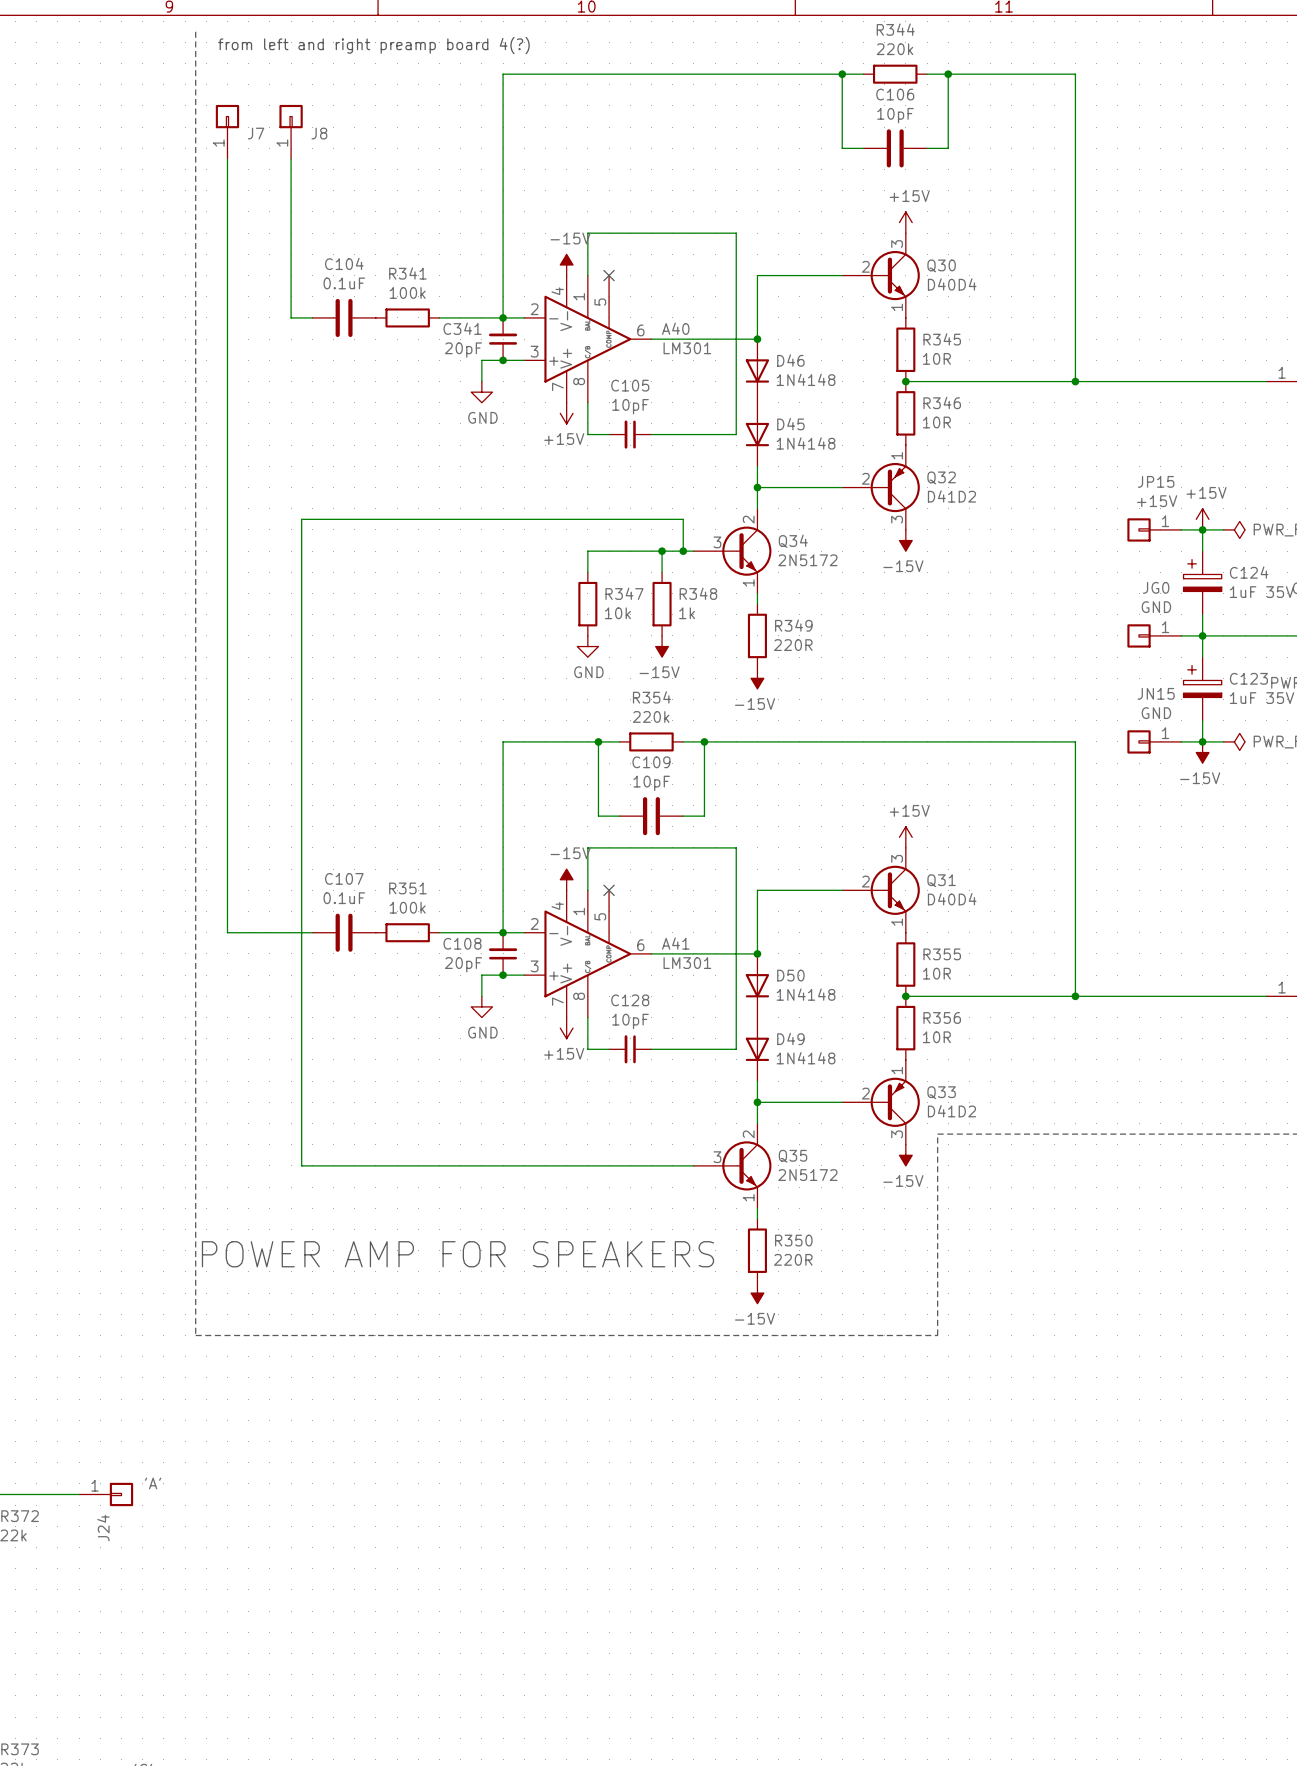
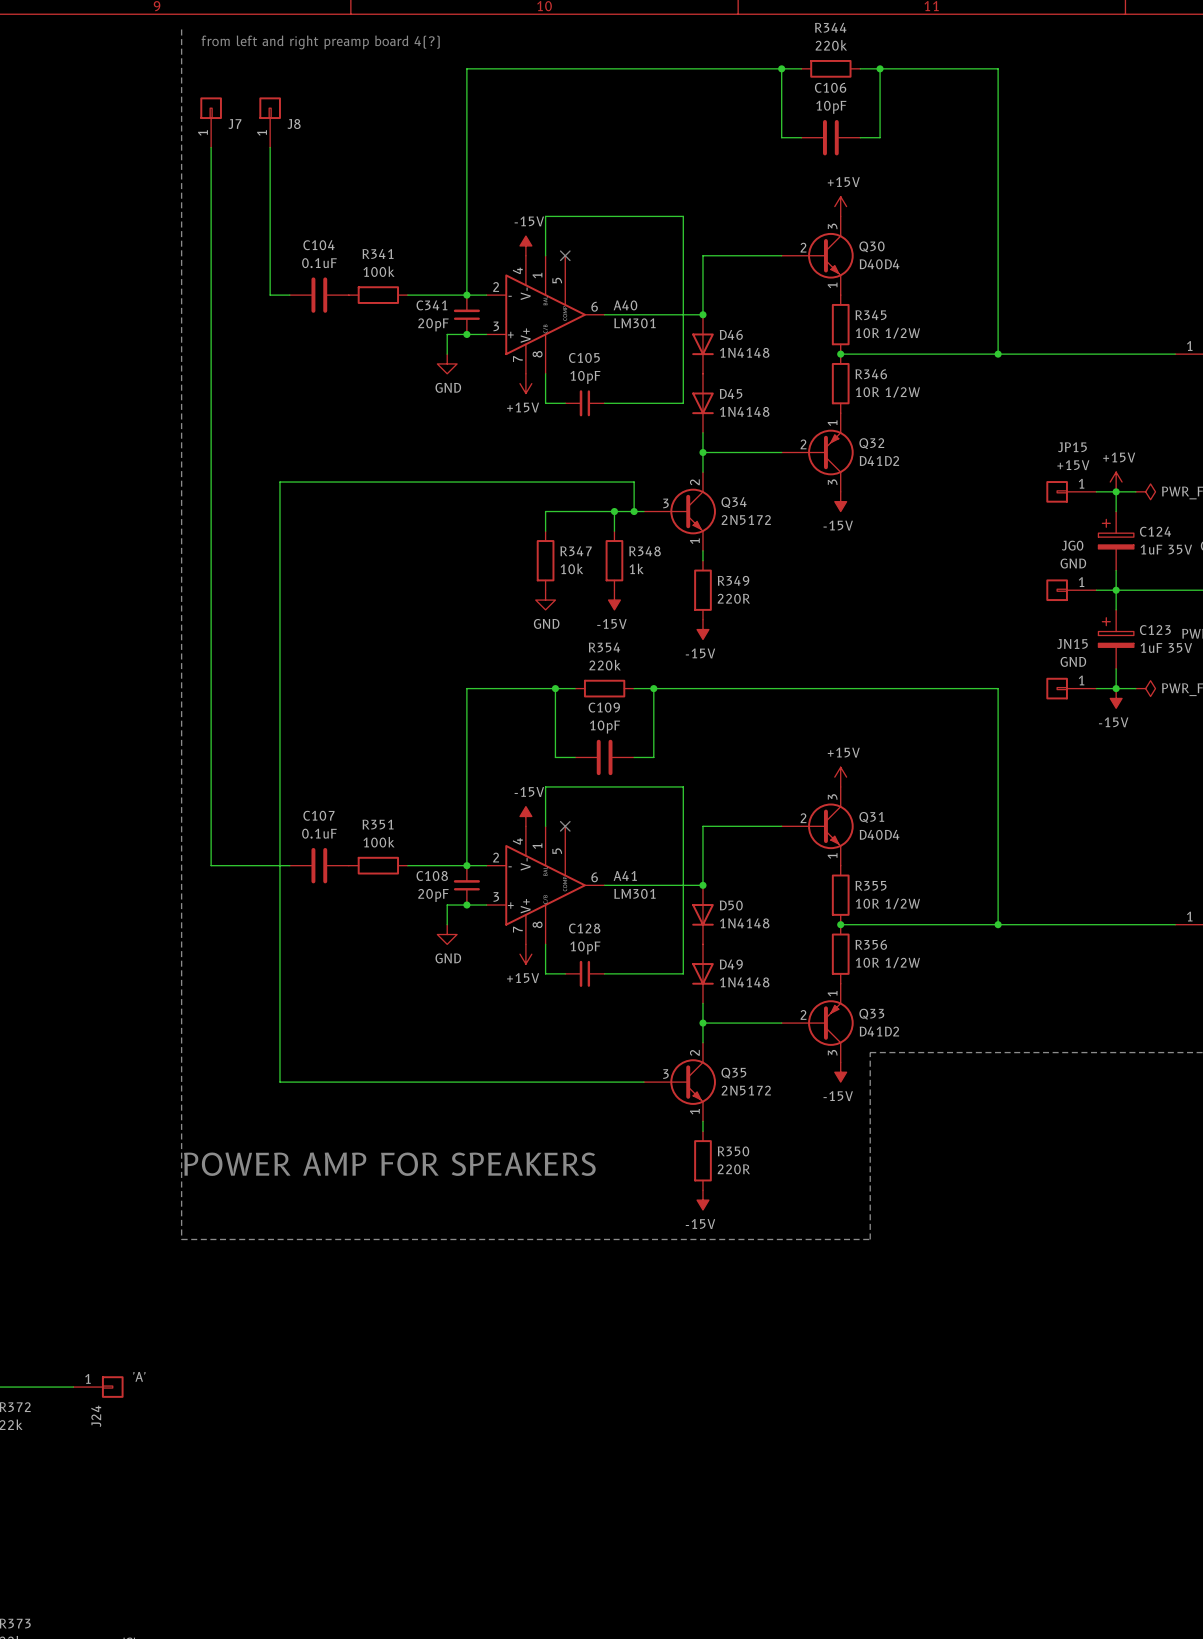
R345 value: 10R (936, 358) -> 10R 1/2W (887, 333)
R346 value: 10R (936, 422) -> 10R 1/2W (887, 392)
R355 value: 10R (936, 973) -> 10R 1/2W (887, 903)
R356 value: 10R (936, 1037) -> 10R 1/2W (887, 962)

